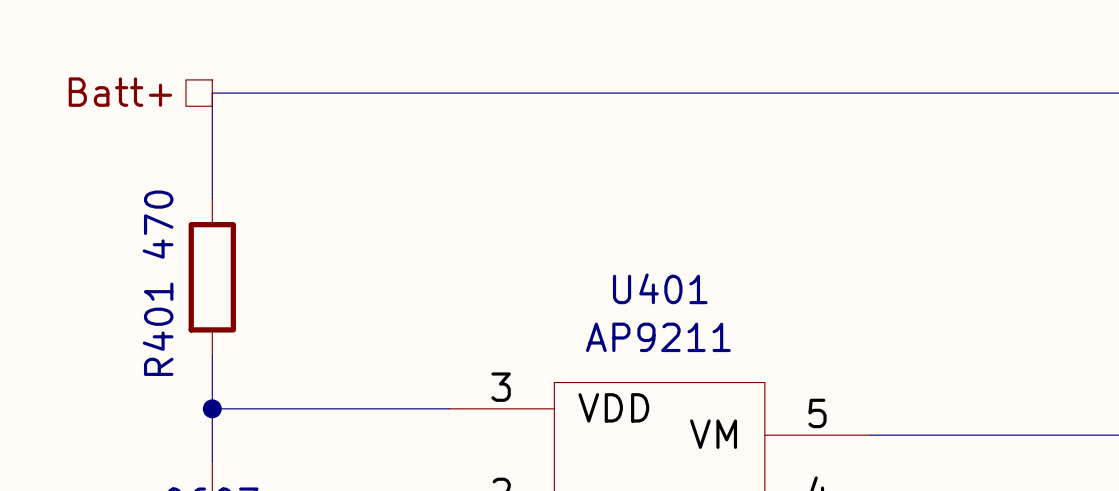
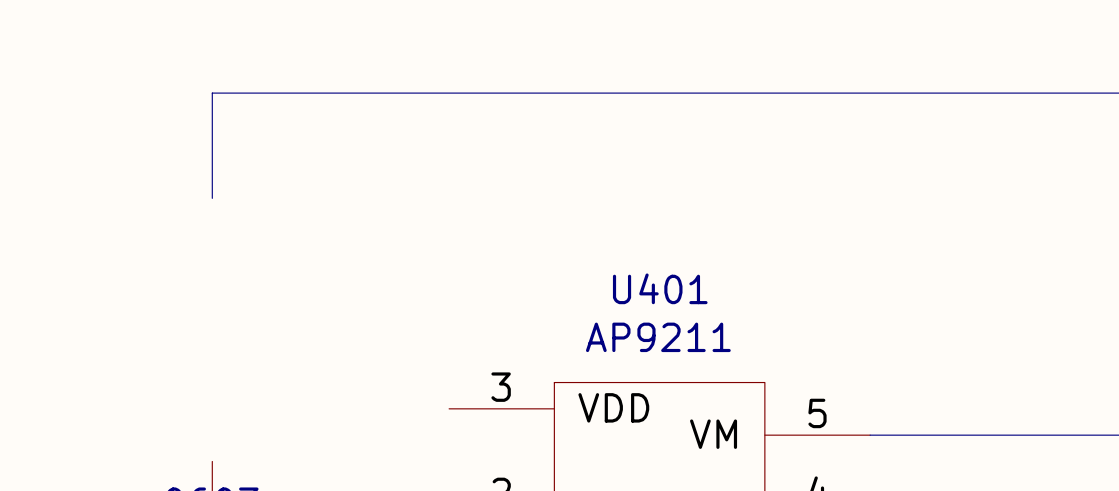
hierarchical label: Batt+ (120, 92) -> none
R401: 470 (212, 277) -> none
wire: (212, 356) (212, 461) -> none
wire: (212, 408) (449, 408) -> none
junction: (212, 408) -> none

